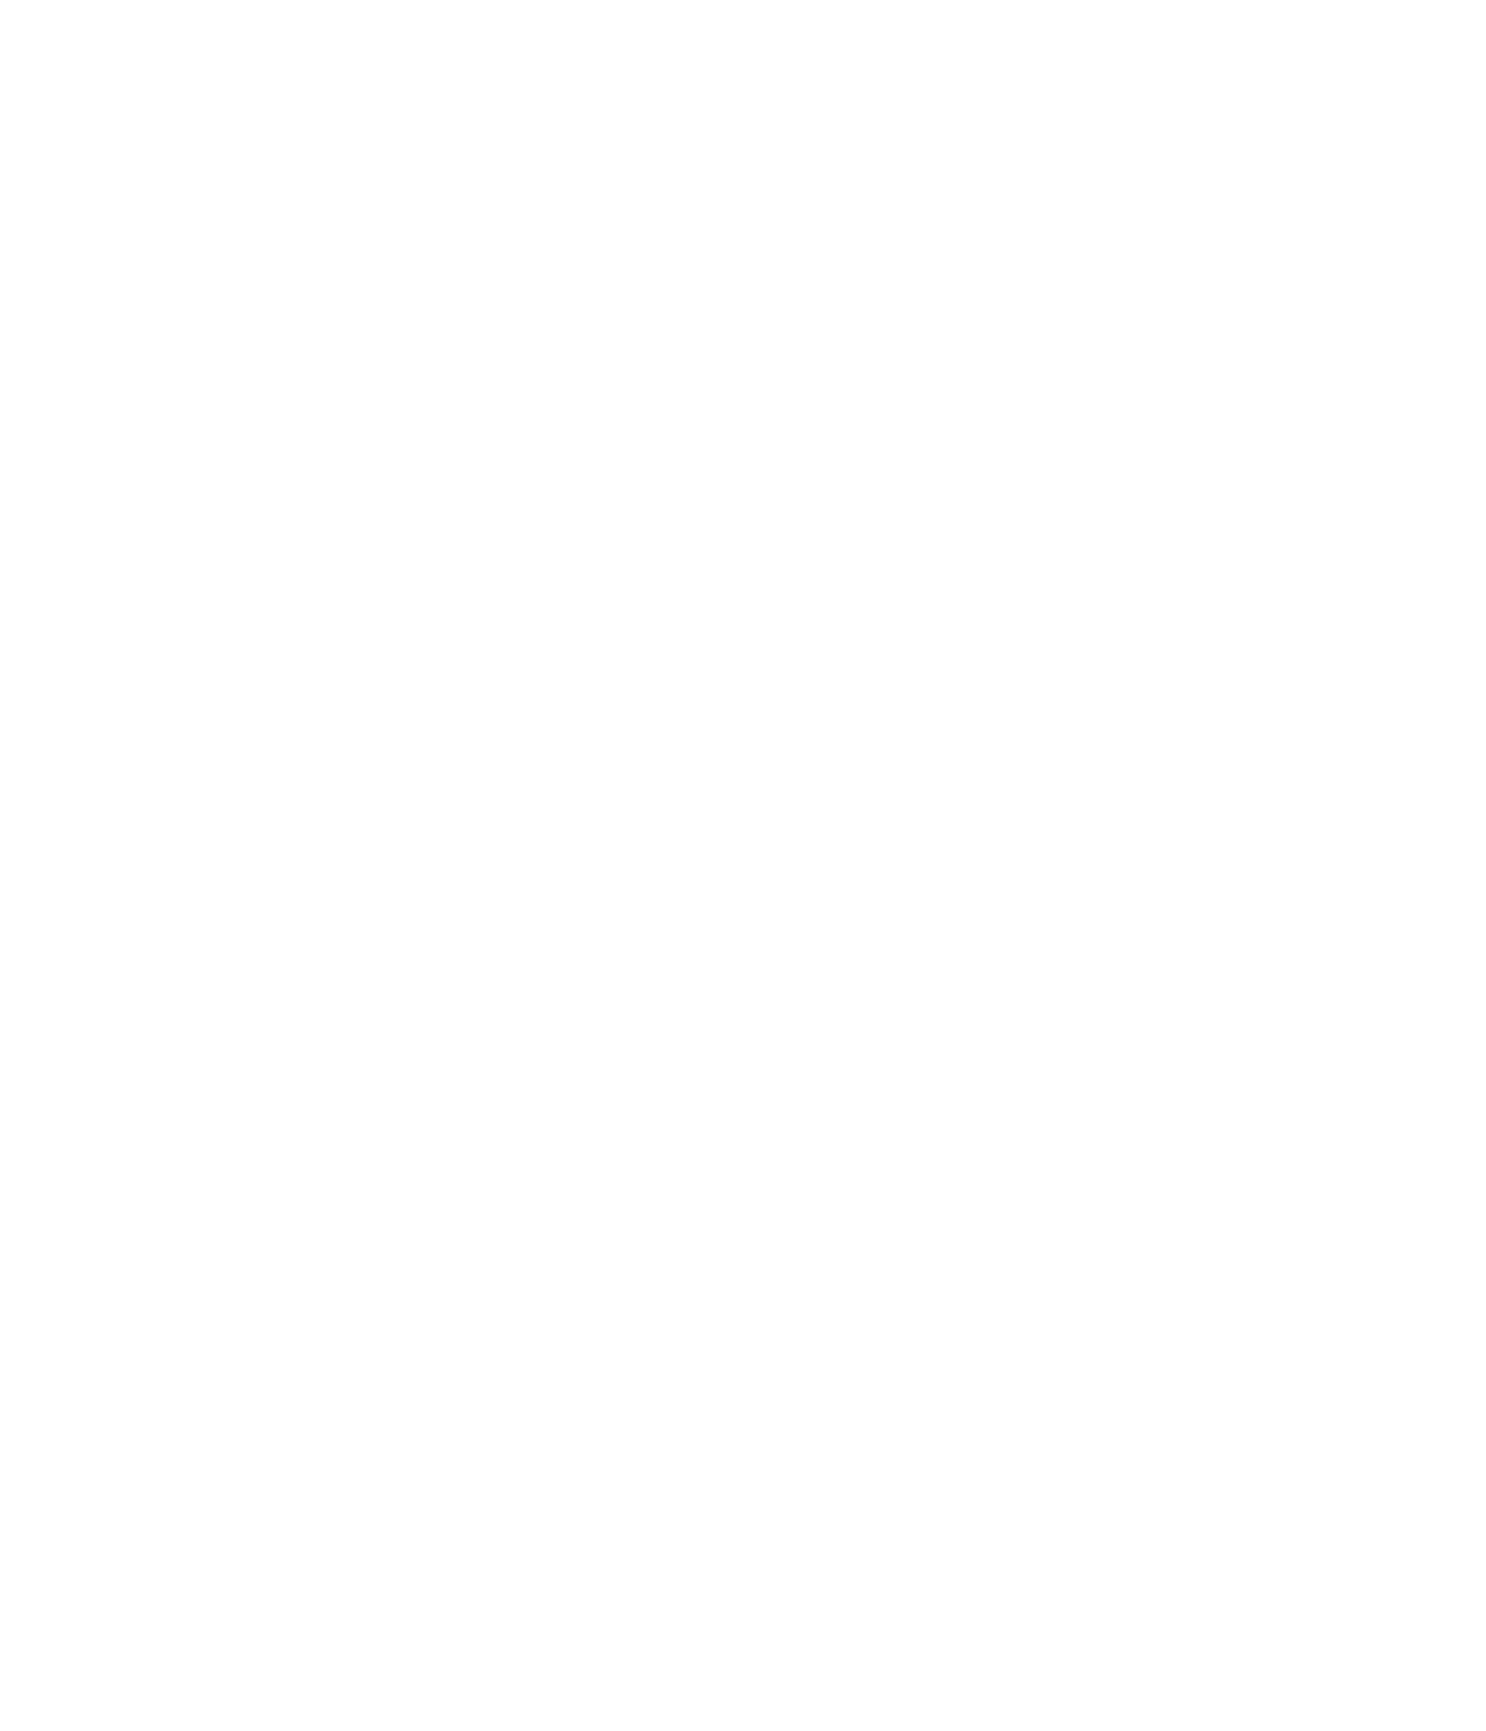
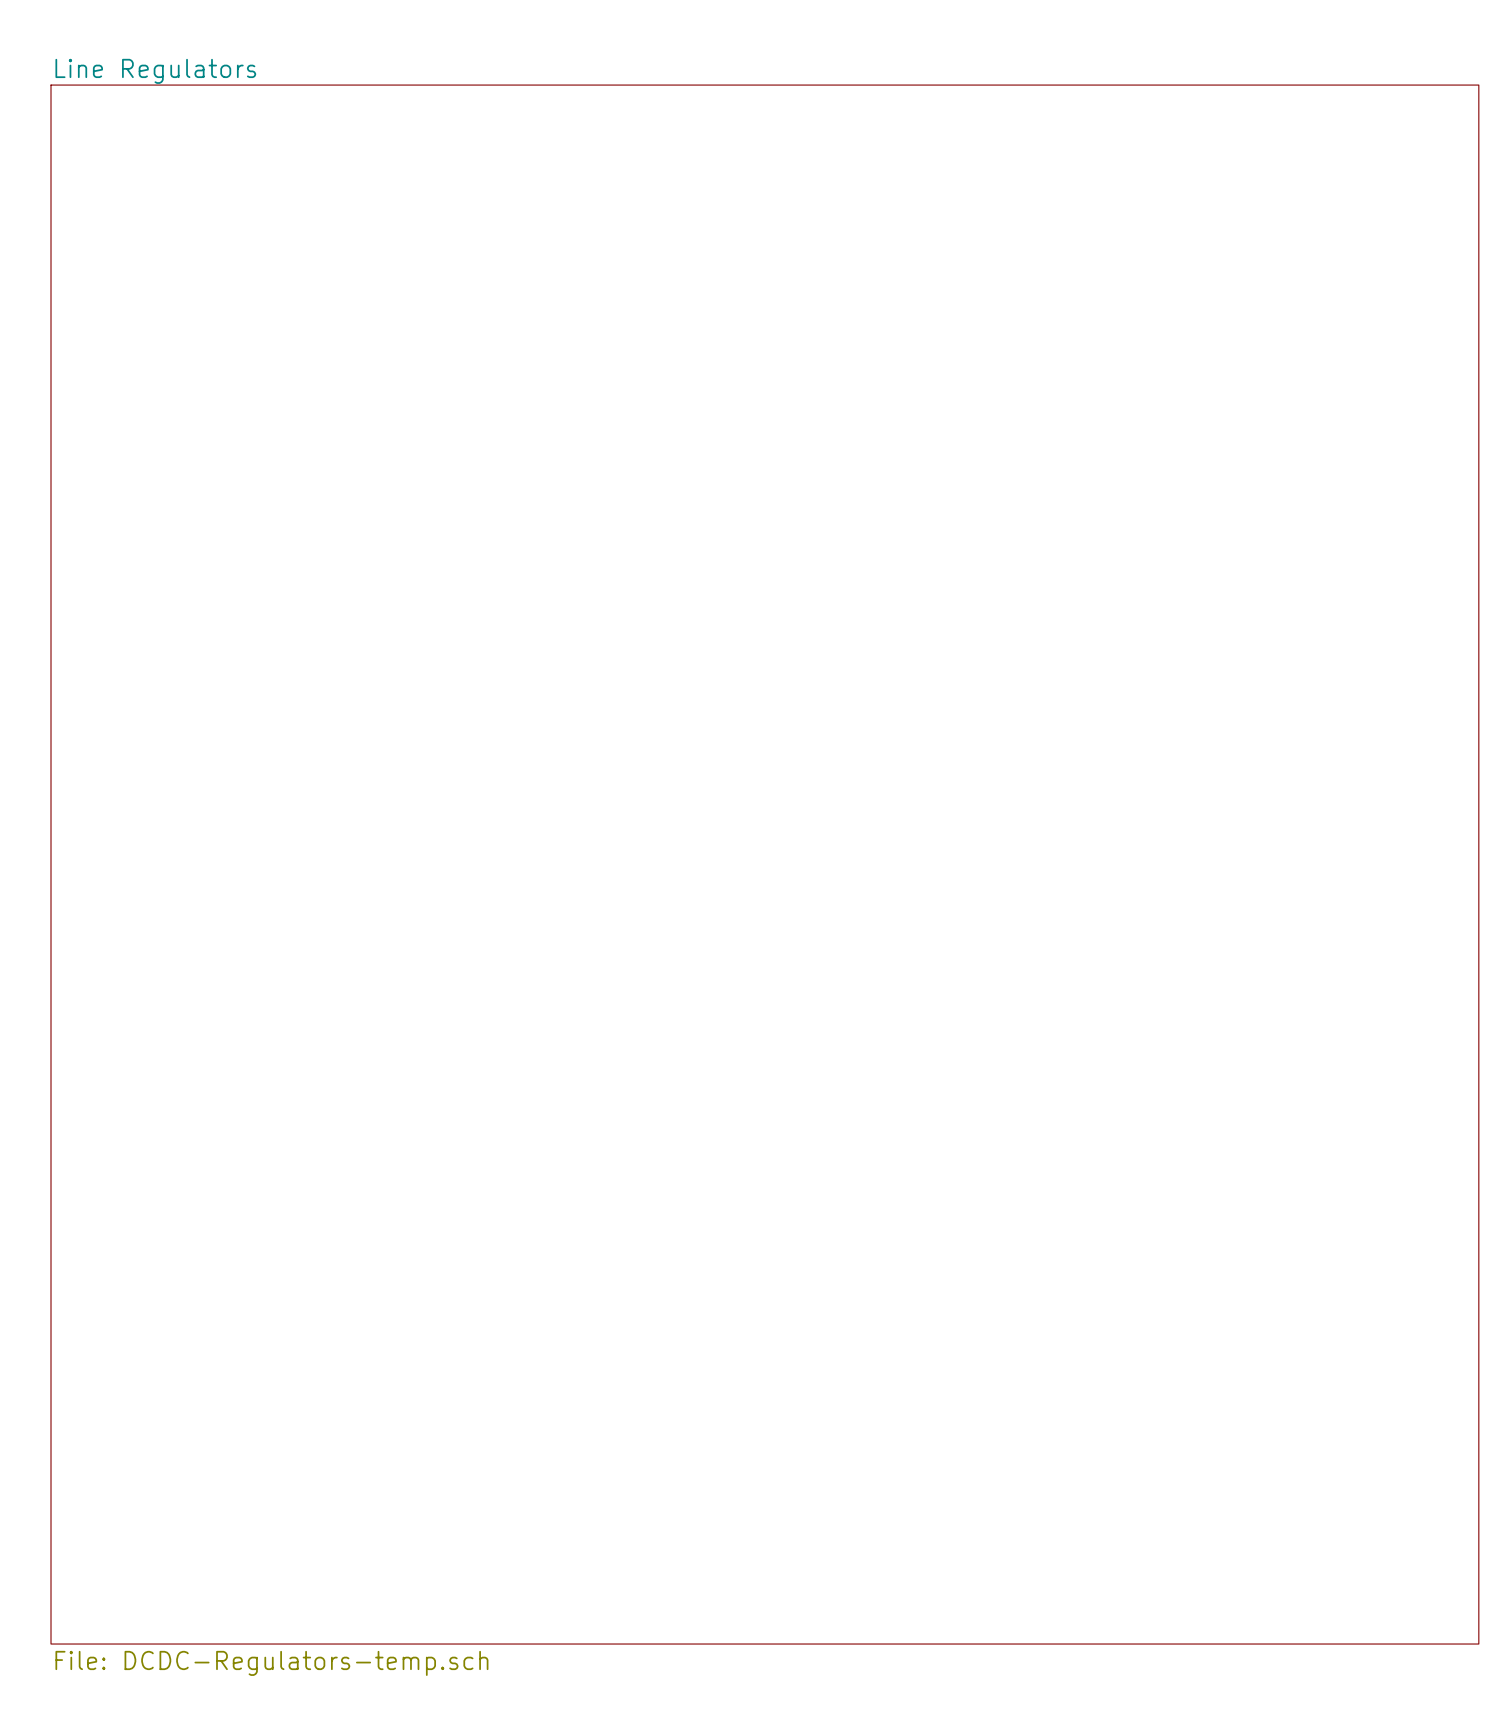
sheet Line Regulators: none -> File: DCDC-Regulators-temp.sch (764, 864)

